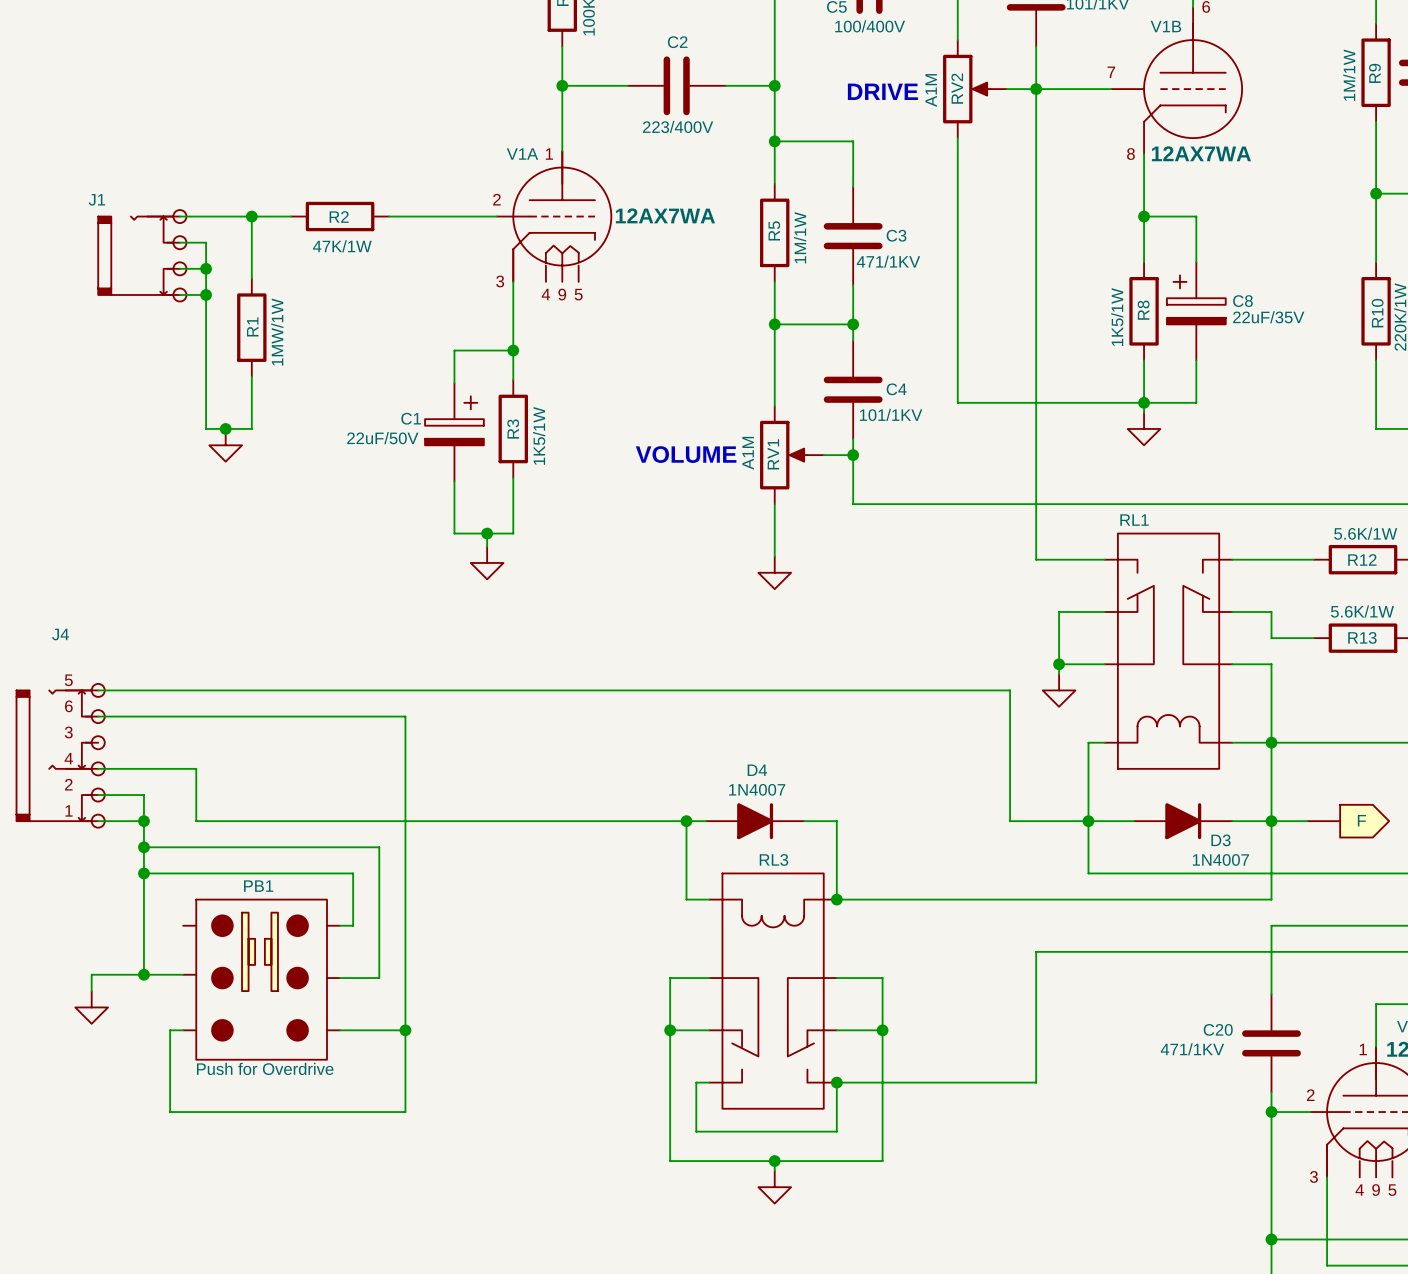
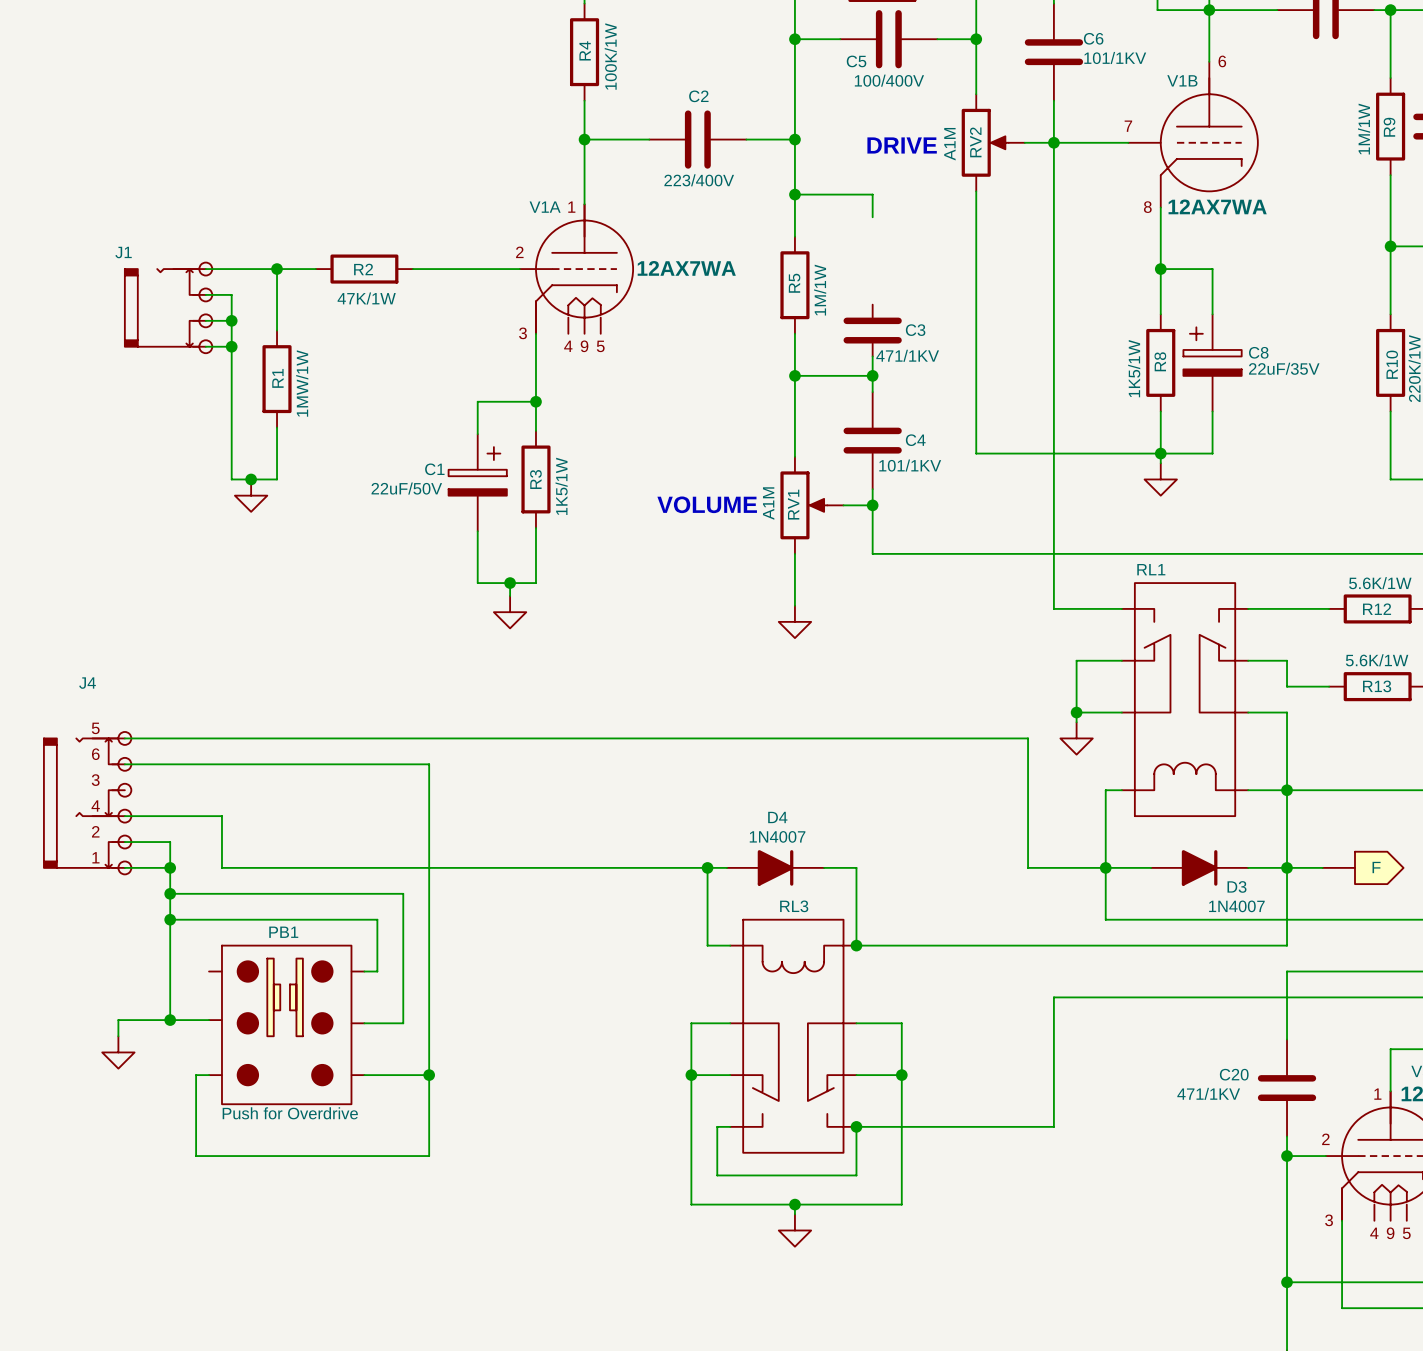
wire: (853, 164) (853, 187) -> none
C3 symbol: [823, 187, 883, 286] -> [843, 304, 902, 357]

